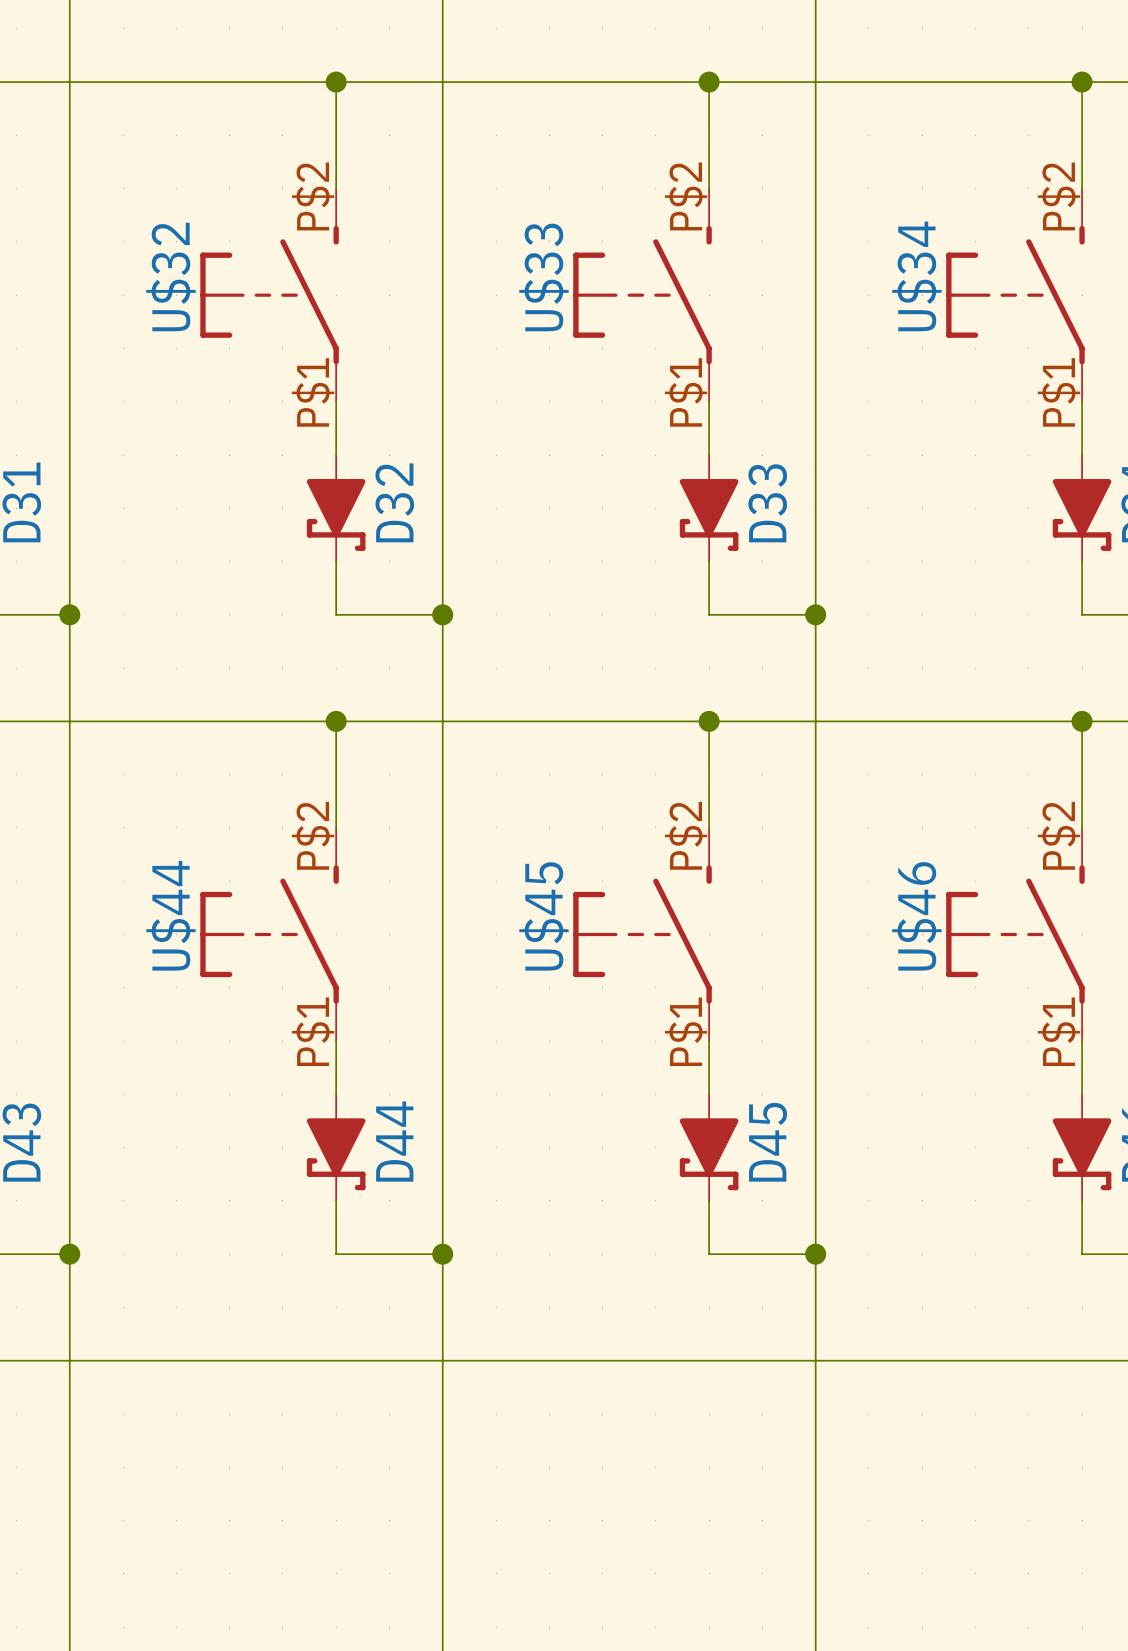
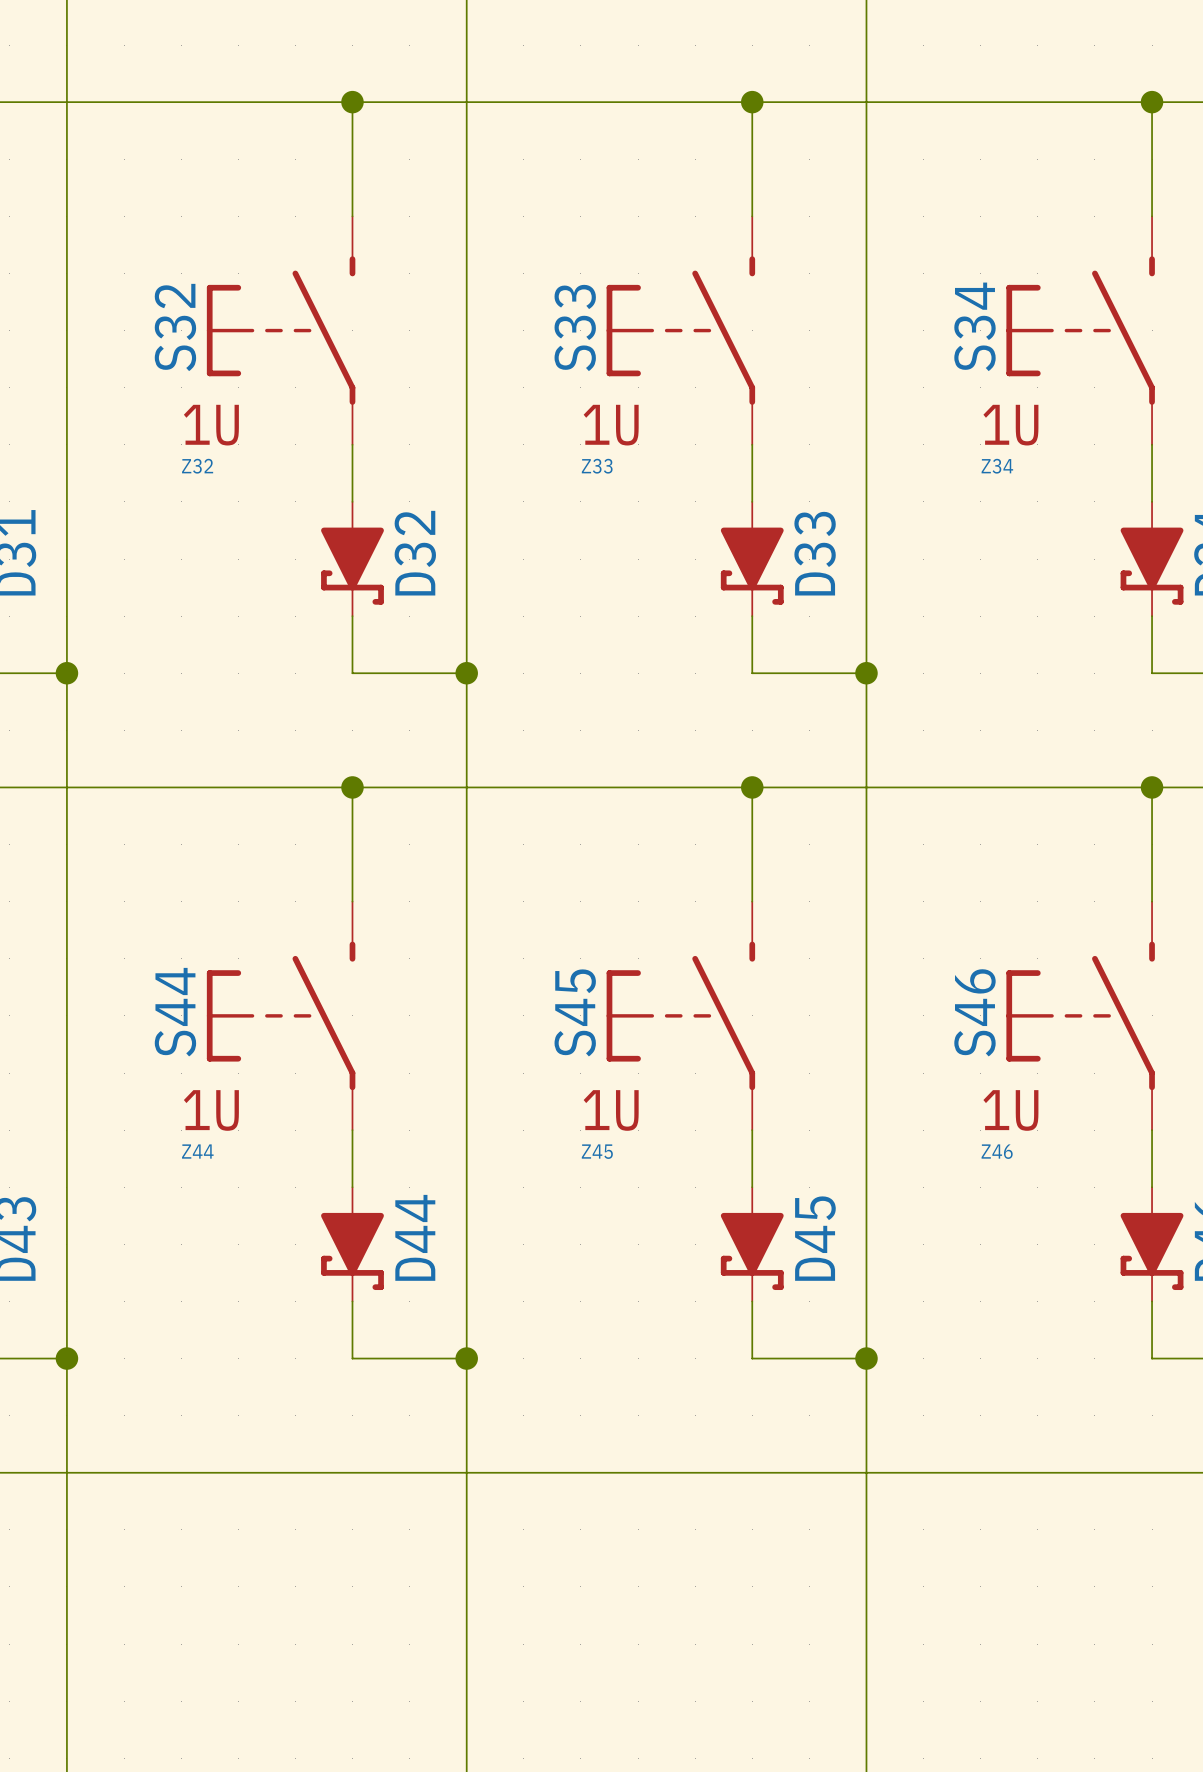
U$32 pin number: P$2 (313, 196) -> none
U$33 pin number: P$2 (686, 196) -> none
U$34 pin number: P$2 (1058, 196) -> none
U$34 name: U$34 (916, 276) -> S34 (974, 326)
U$32 name: U$32 (171, 277) -> S32 (175, 327)
U$33 name: U$33 (543, 277) -> S33 (575, 327)
U$32 pin number: P$1 (313, 392) -> none
U$33 pin number: P$1 (686, 392) -> none
U$34 pin number: P$1 (1058, 392) -> none
Z32: none -> (210, 439)
Z33: none -> (610, 439)
Z34: none -> (1010, 439)
U$44 pin number: P$2 (313, 835) -> none
U$45 pin number: P$2 (686, 835) -> none
U$46 pin number: P$2 (1058, 835) -> none
U$44 name: U$44 (171, 915) -> S44 (175, 1012)
U$45 name: U$45 (543, 916) -> S45 (575, 1012)
U$46 name: U$46 (916, 916) -> S46 (974, 1012)
U$44 pin number: P$1 (313, 1031) -> none
U$45 pin number: P$1 (686, 1031) -> none
U$46 pin number: P$1 (1058, 1031) -> none
Z44: none -> (210, 1124)
Z45: none -> (610, 1124)
Z46: none -> (1010, 1124)

